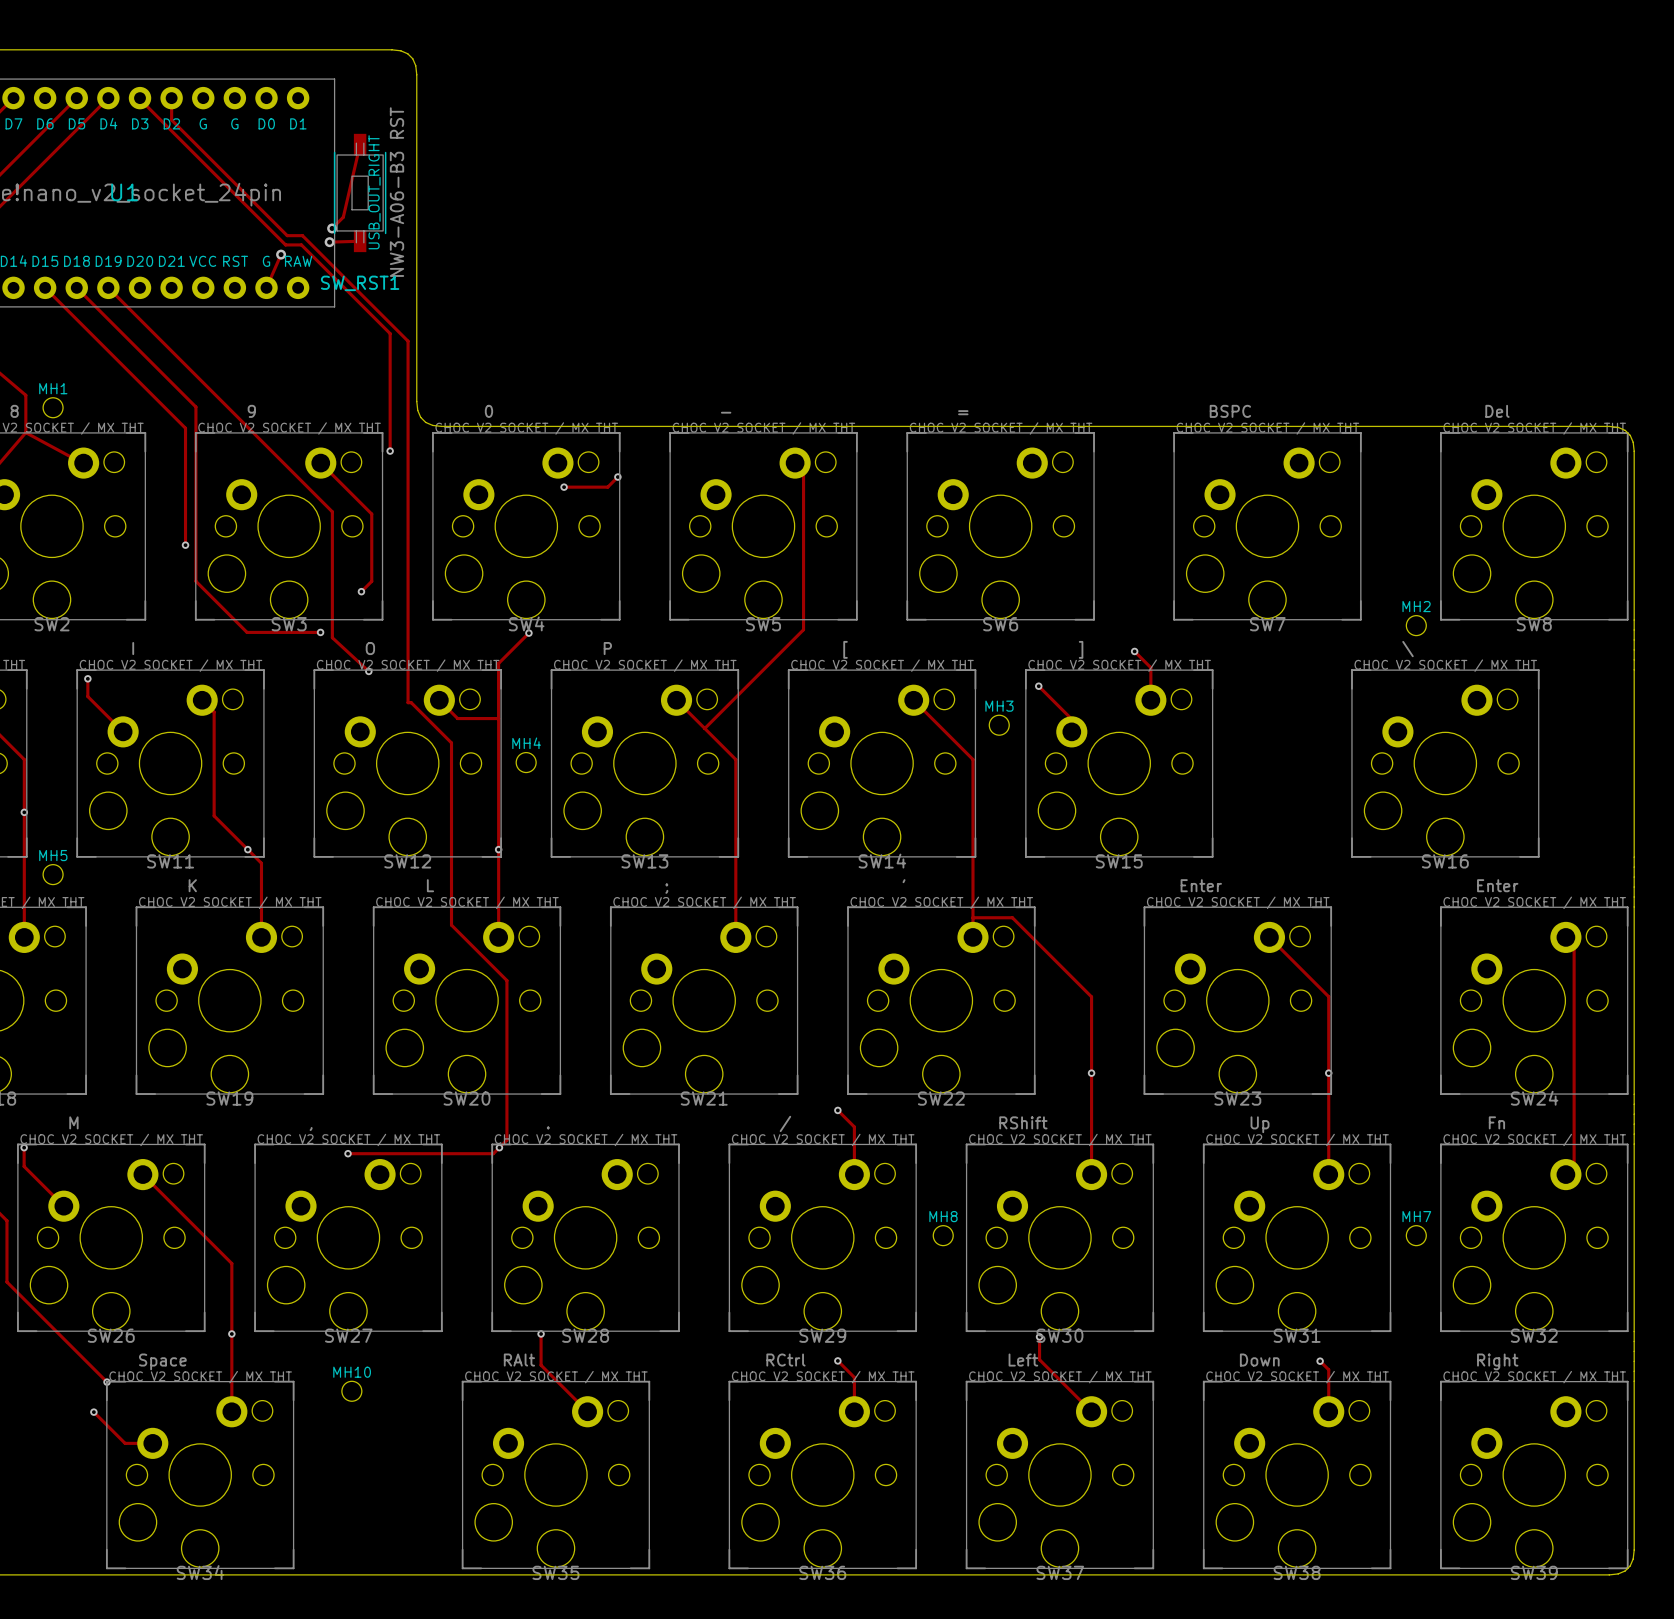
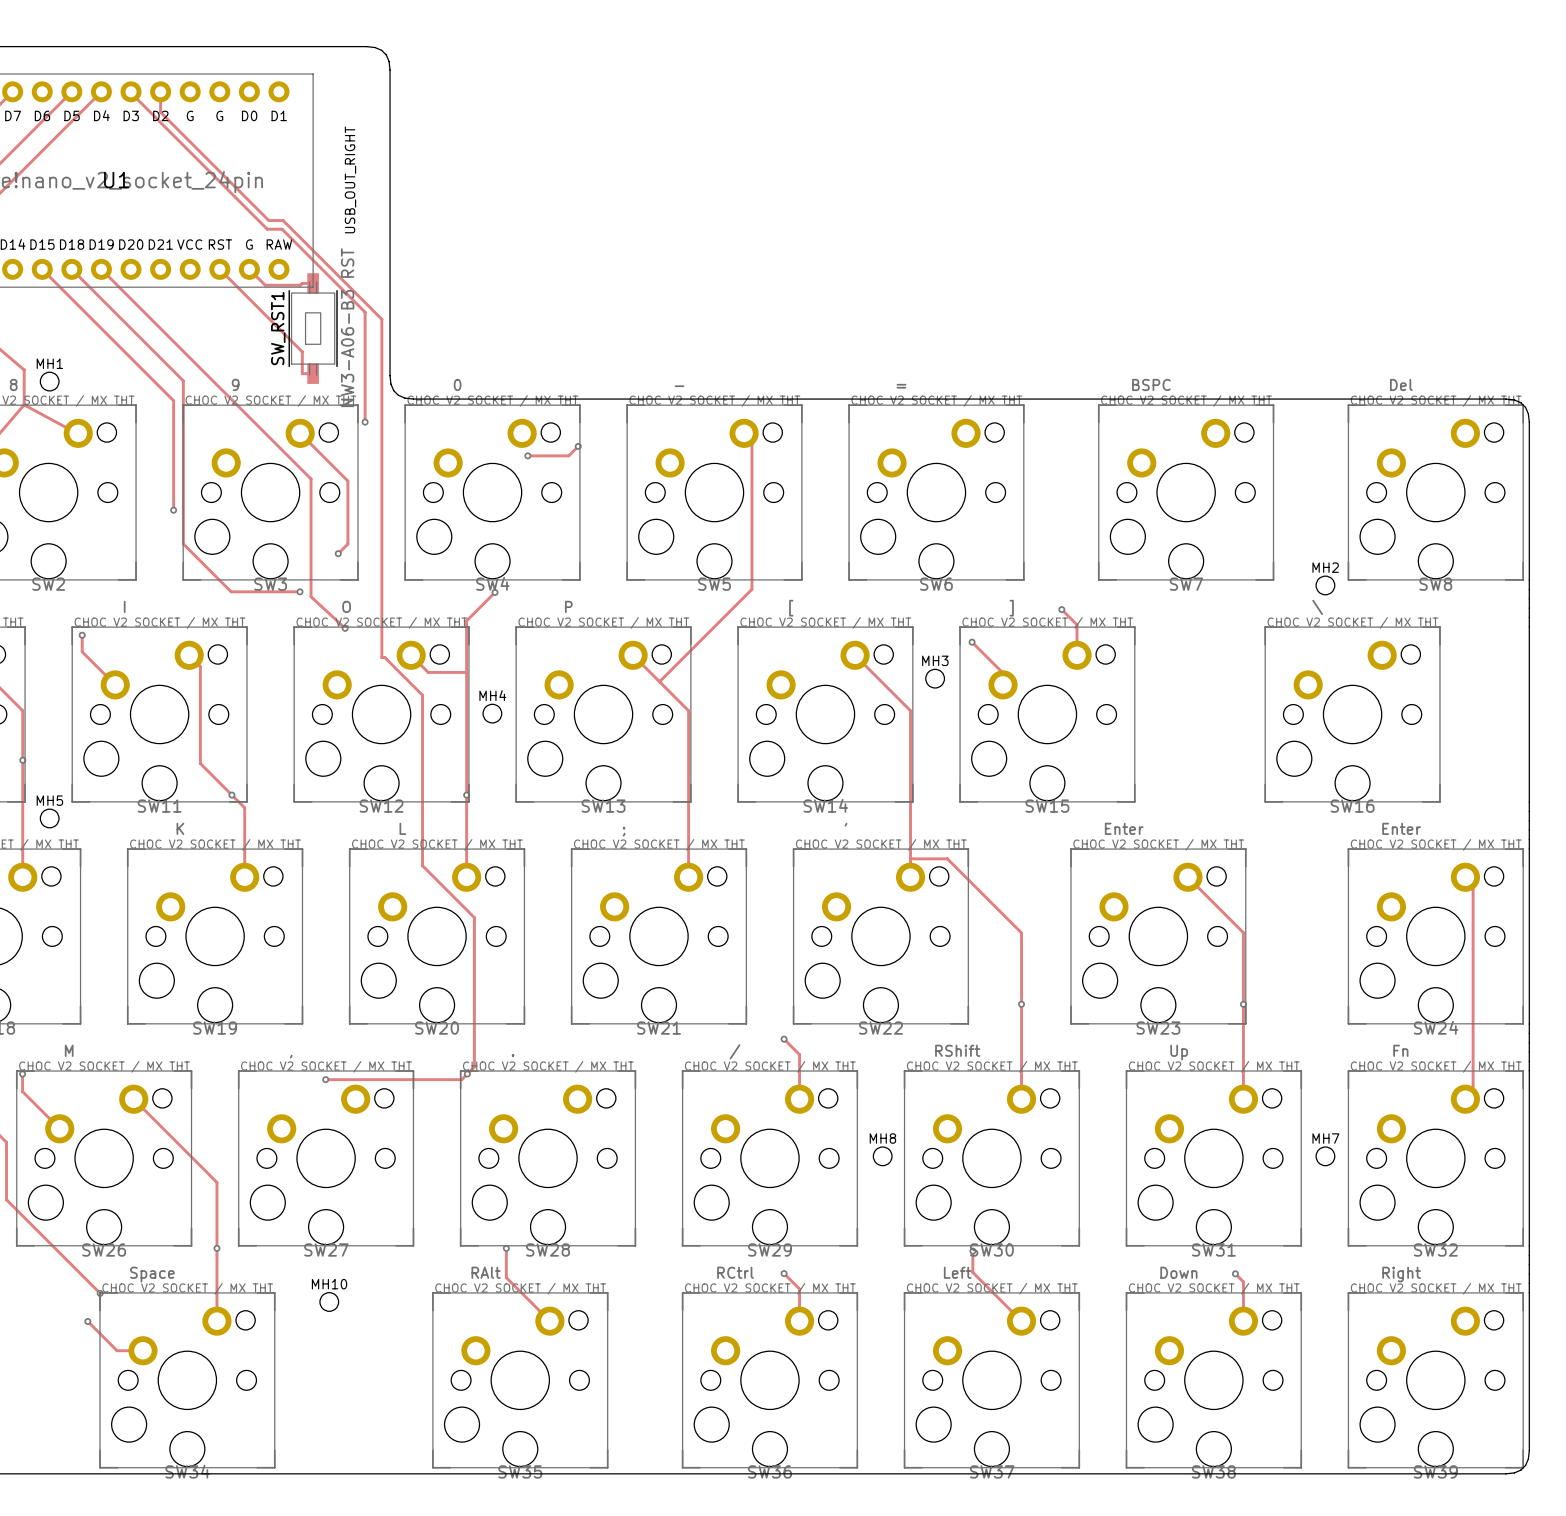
track: (360, 144) (343, 217) (332, 228) -> none
SW_RST1 position: (360, 192) -> (313, 328)
via: (332, 228) -> none
track: (360, 241) (329, 242) -> none
via: (329, 242) -> none
track: (281, 254) (266, 287) -> (313, 283) (265, 285) (249, 269)
via: (281, 254) -> none
SW_RST1 name rotation: 0° (360, 283) -> 90° counterclockwise (278, 328)
track: none -> (219, 269) (302, 351) (302, 373) (313, 373)

